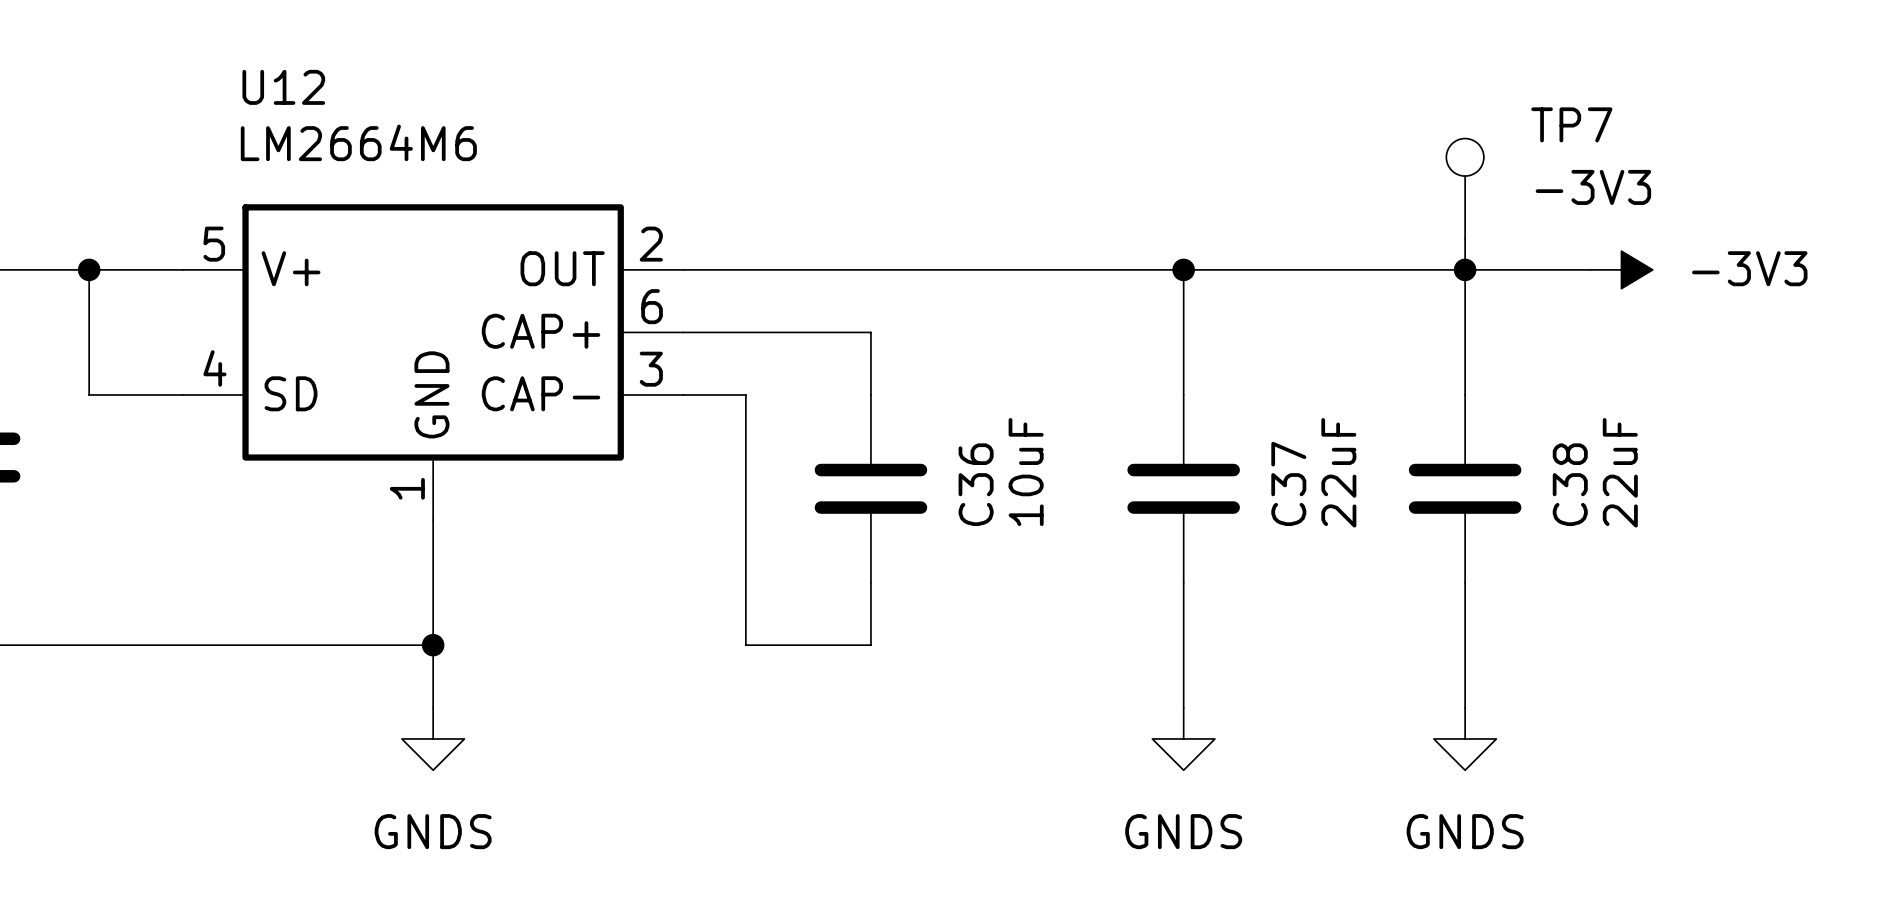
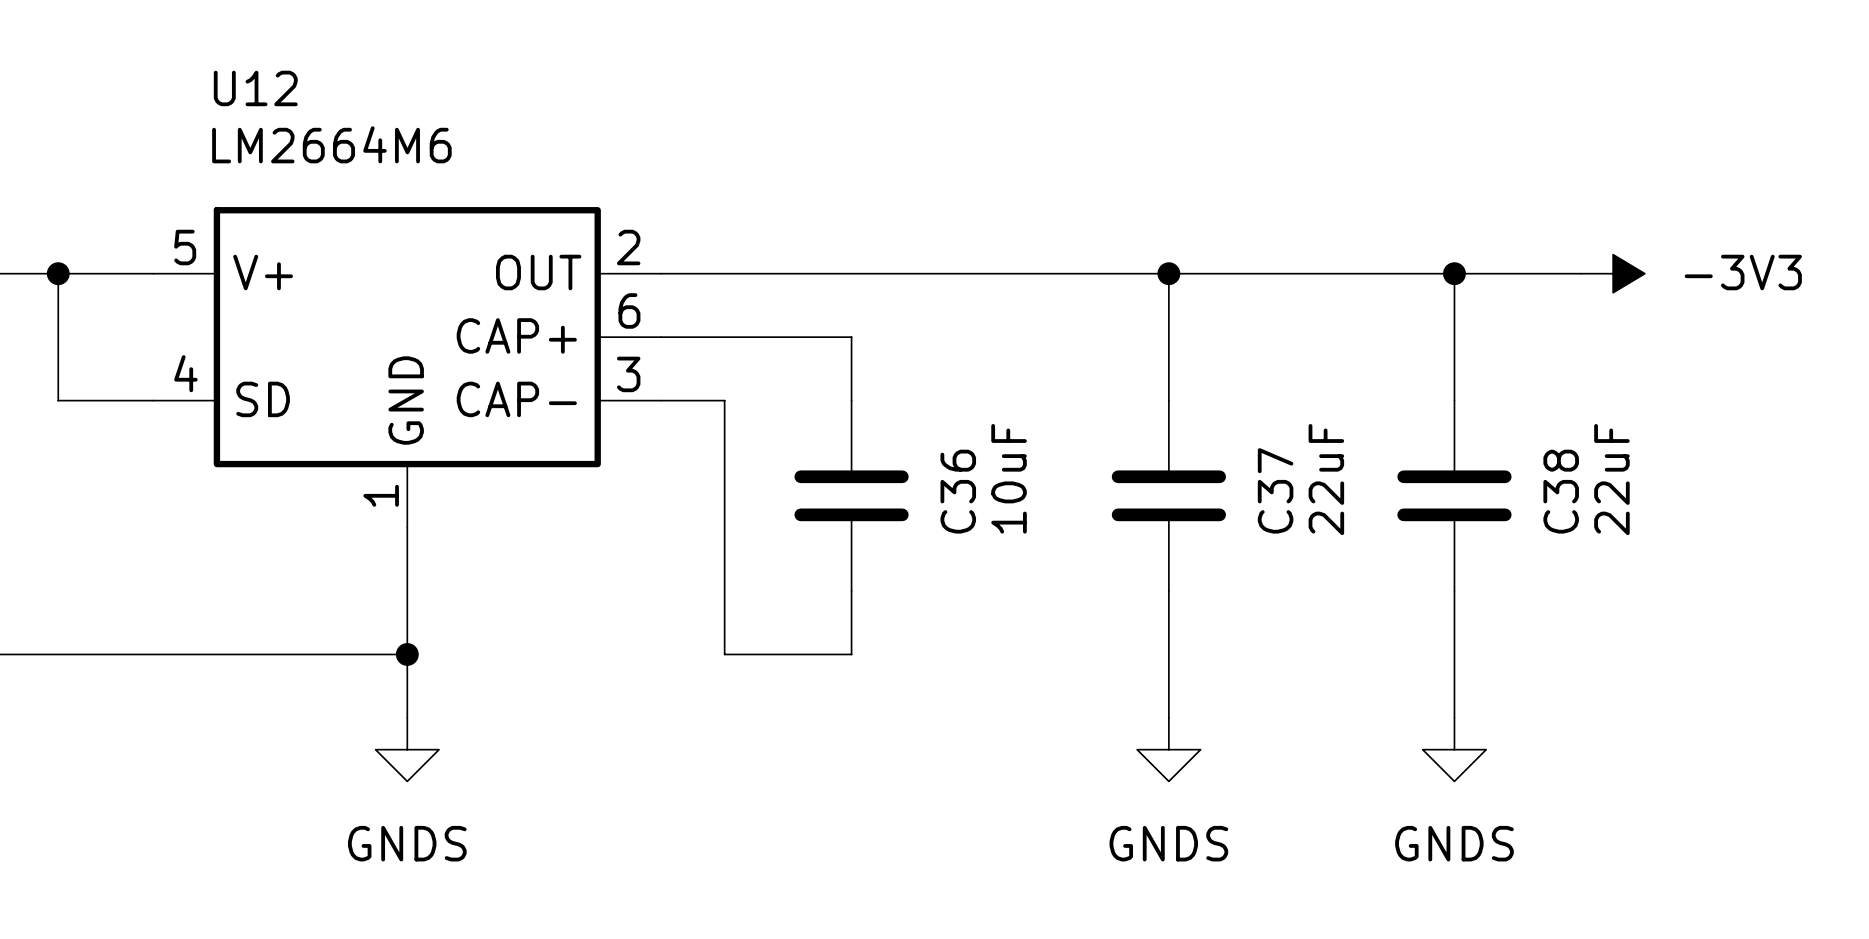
TP7: -3V3 (1465, 188) -> none
wire: (1465, 238) (1465, 269) -> none

